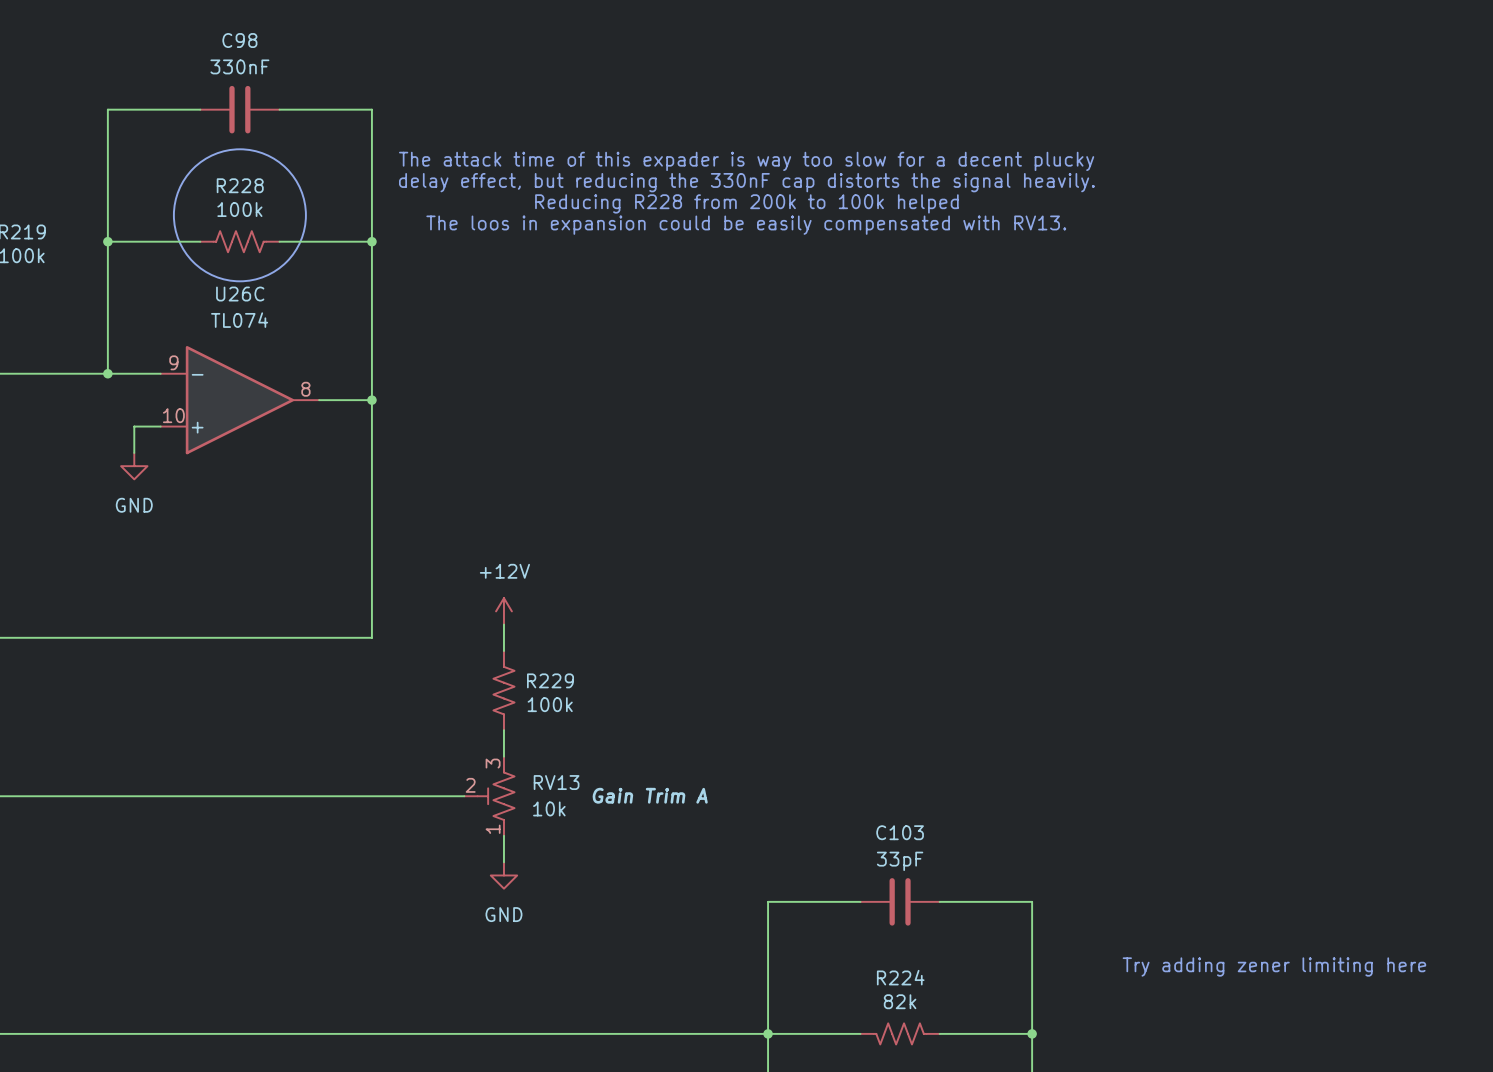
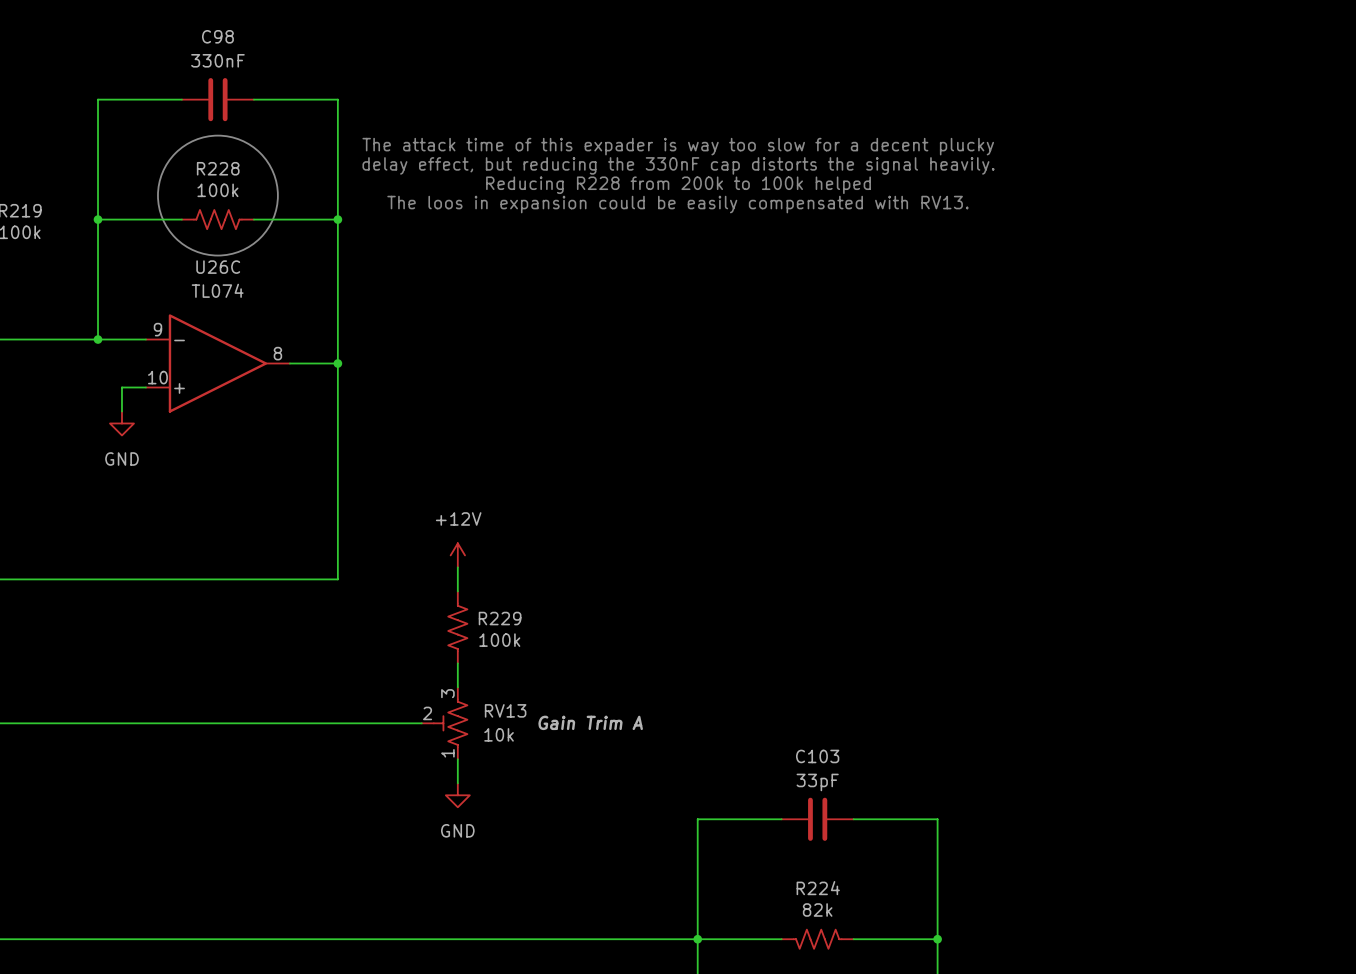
text: Try adding zener limiting here (1274, 967) -> none

